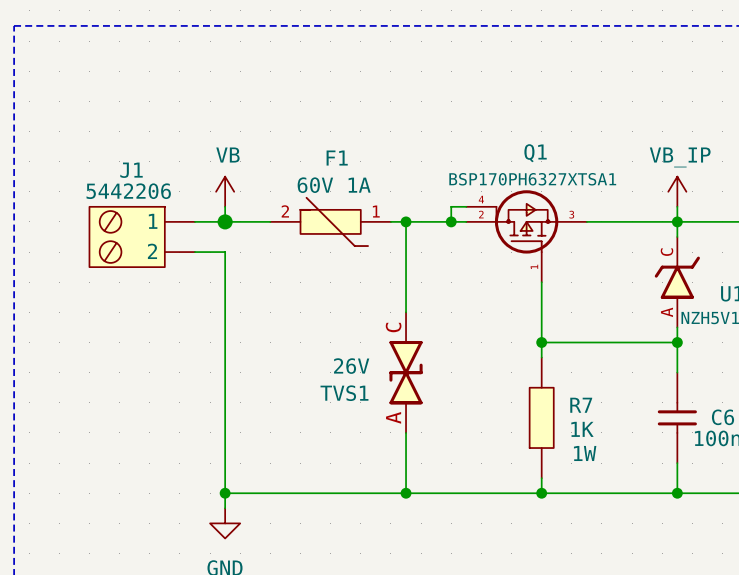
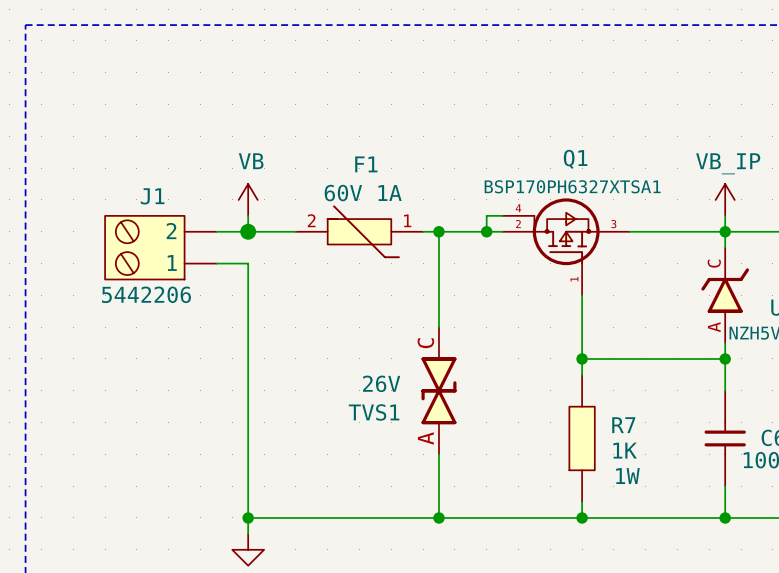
J1 flip: as is (127, 236) -> up-down (144, 247)

